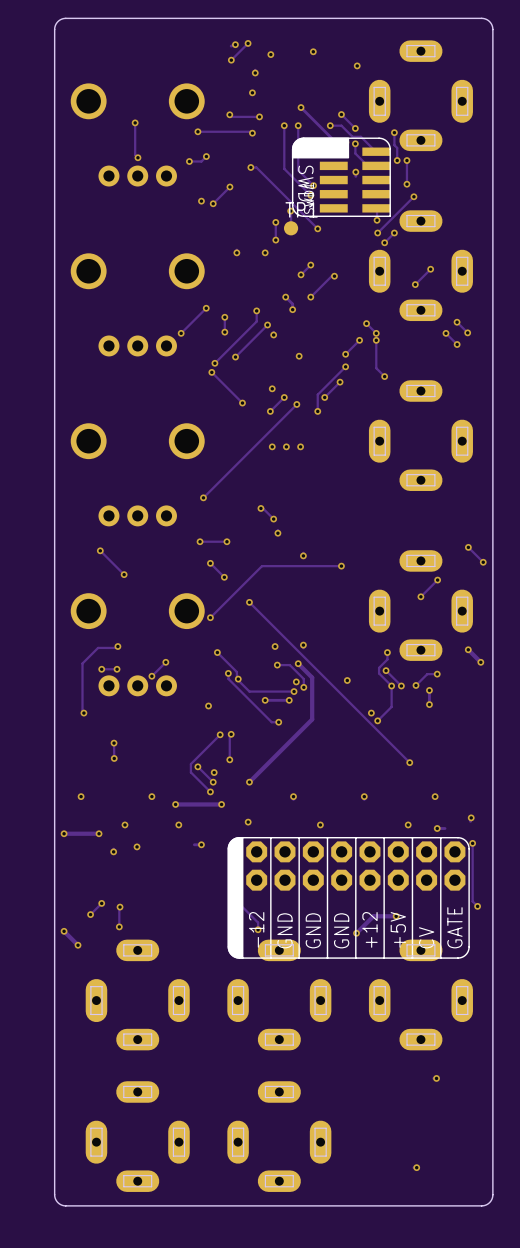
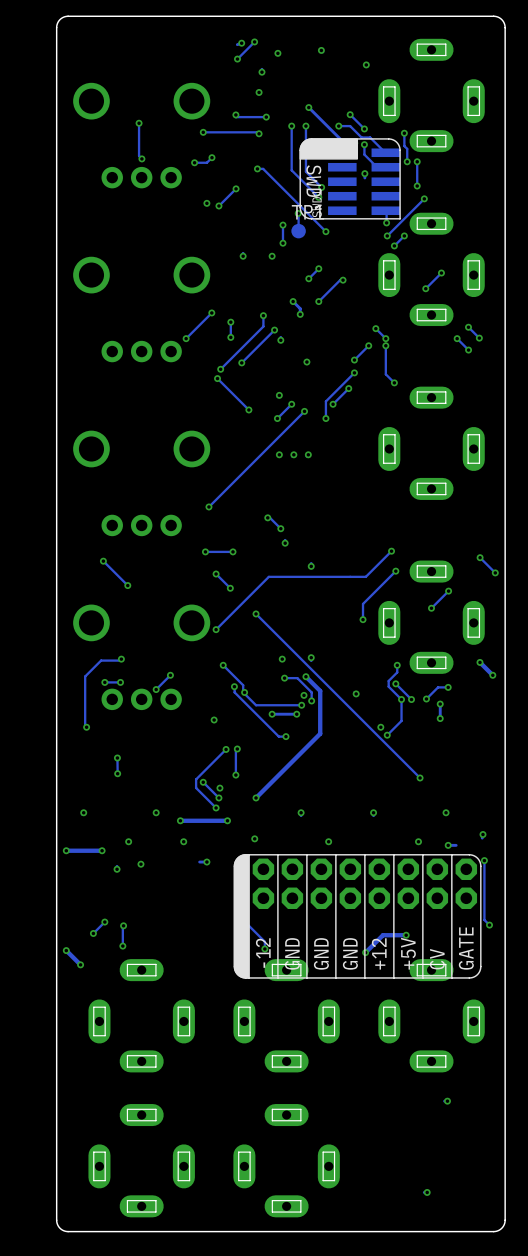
via: none -> (391, 551)
track: none -> (395, 571) (363, 603) (363, 619)
via: none -> (395, 571)
track: (341, 566) (262, 566) -> (391, 551) (365, 576) (268, 576)
via: (341, 566) -> none
via: none -> (363, 619)

